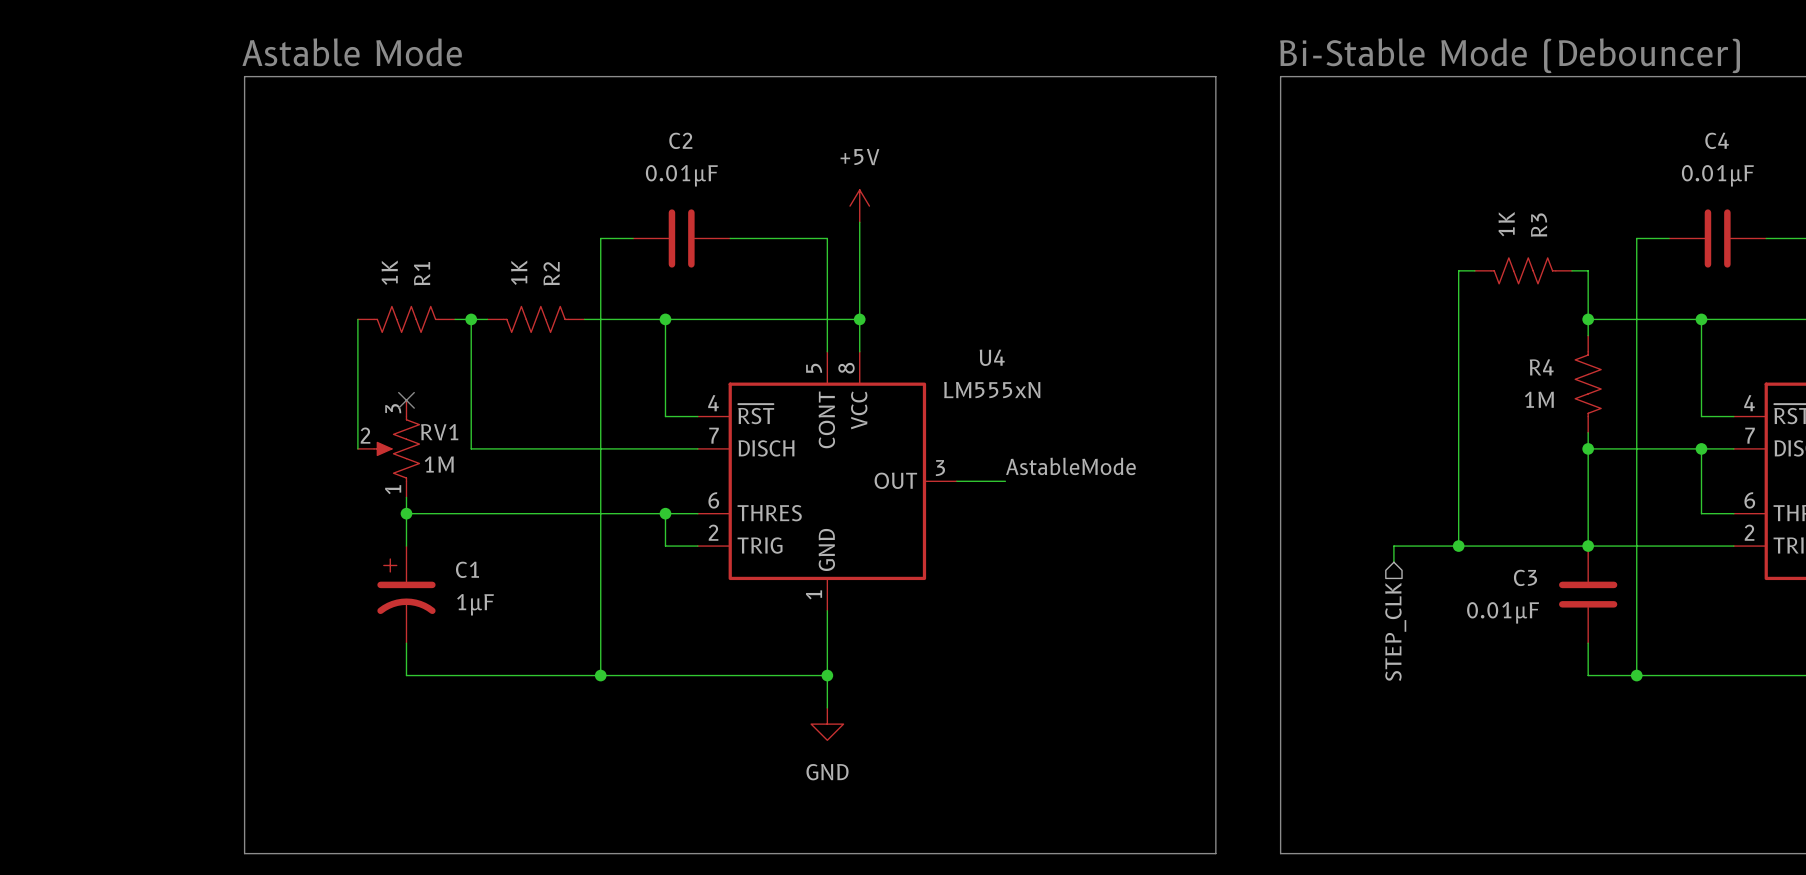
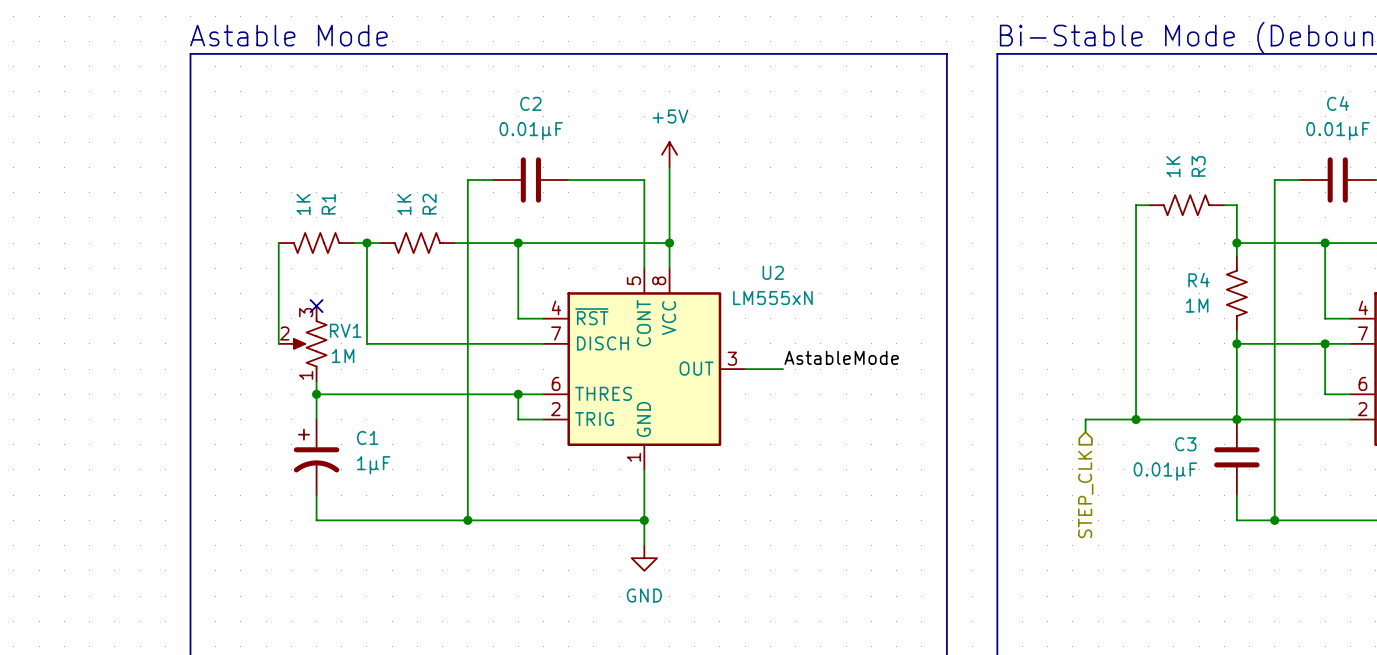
U4 name: U4 (992, 357) -> U2 (773, 272)

